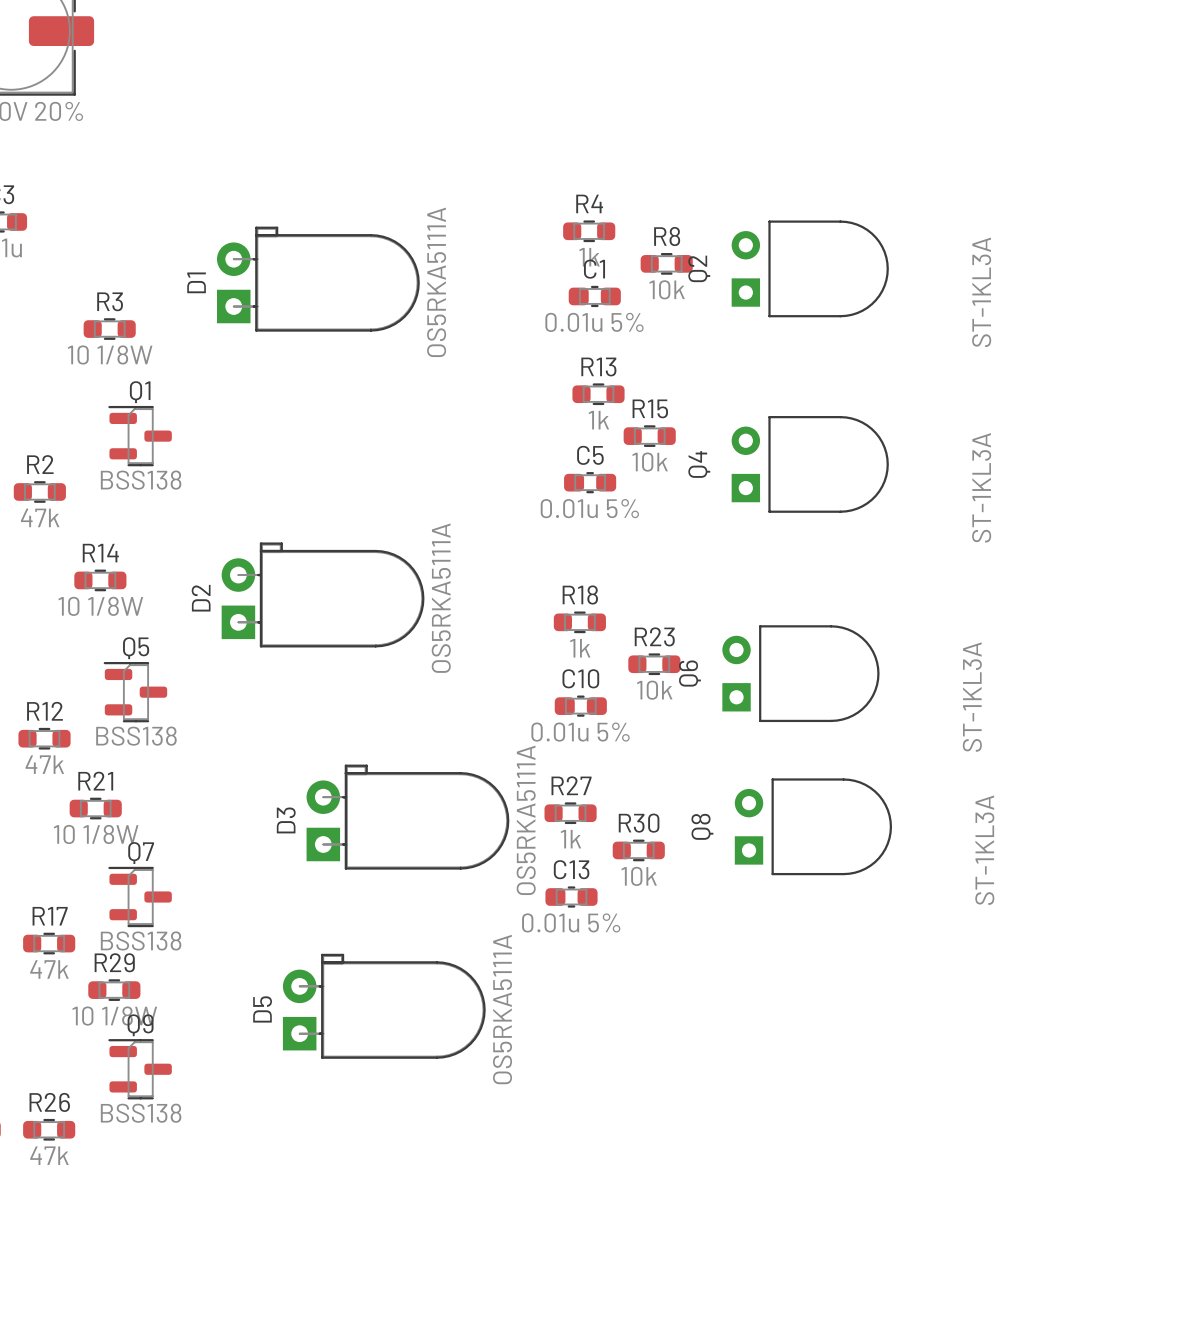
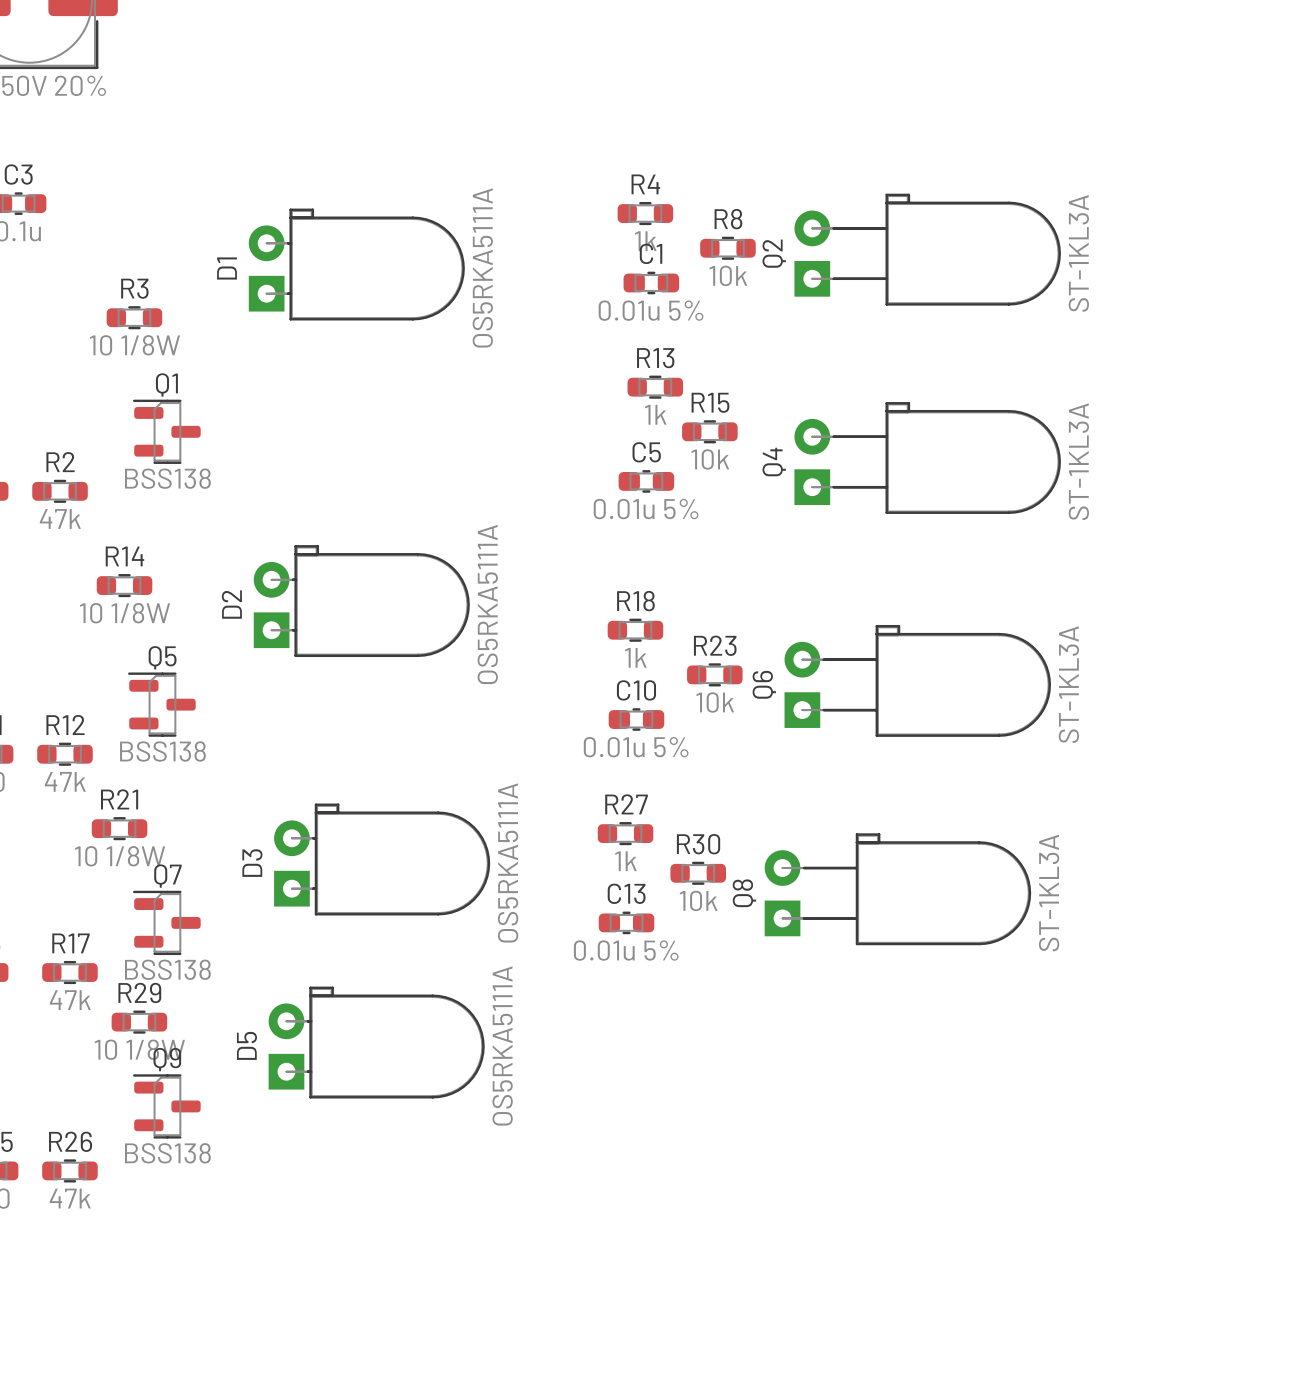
Q2 footprint: [731, 220, 889, 318] -> [794, 193, 1061, 306]
Q4 footprint: [731, 416, 889, 513] -> [794, 402, 1061, 514]
Q6 footprint: [722, 625, 880, 723] -> [784, 624, 1052, 737]
Q8 footprint: [734, 778, 893, 876] -> [764, 833, 1032, 946]
D3 position: (407, 817) -> (382, 859)
D5 position: (384, 1006) -> (376, 1042)

